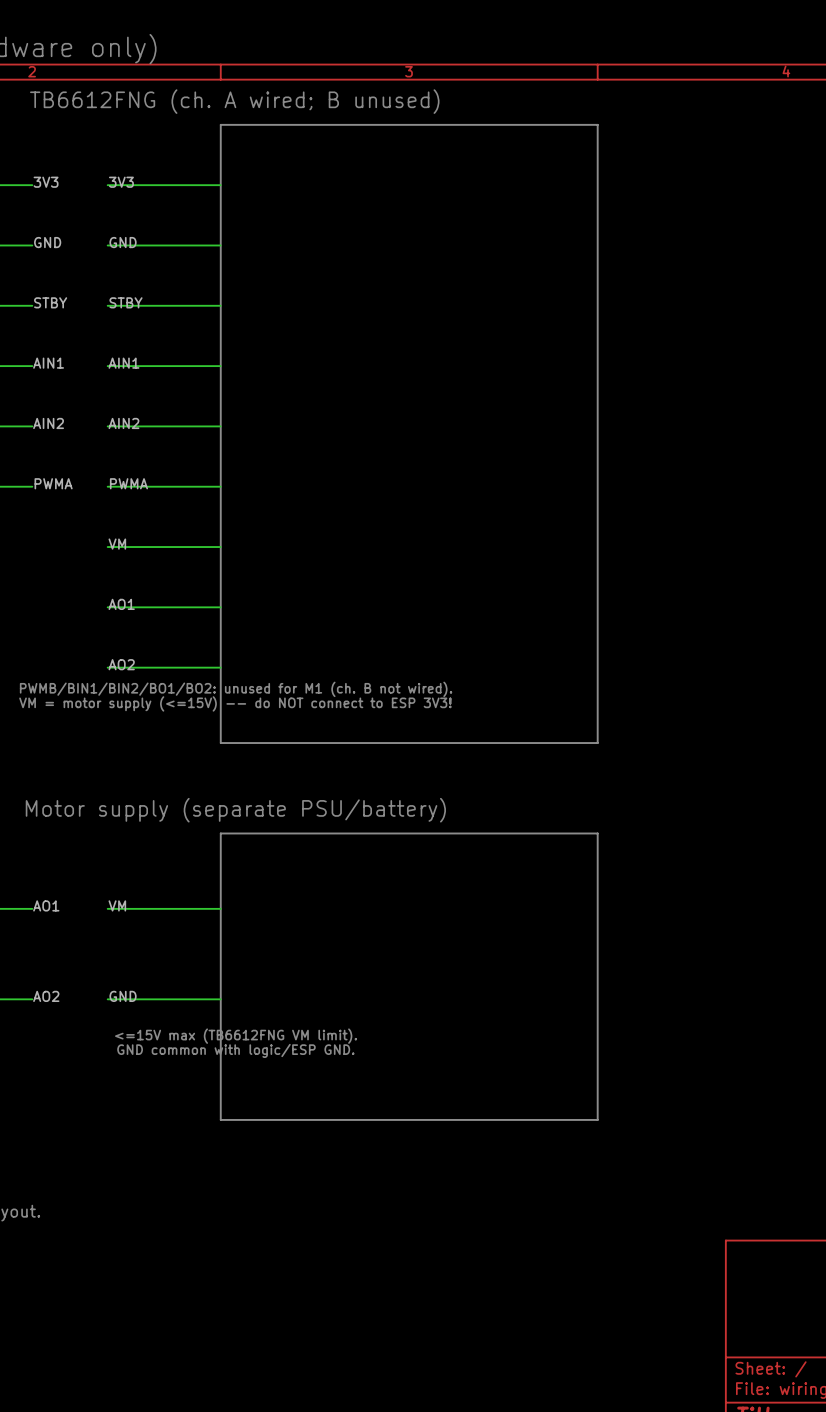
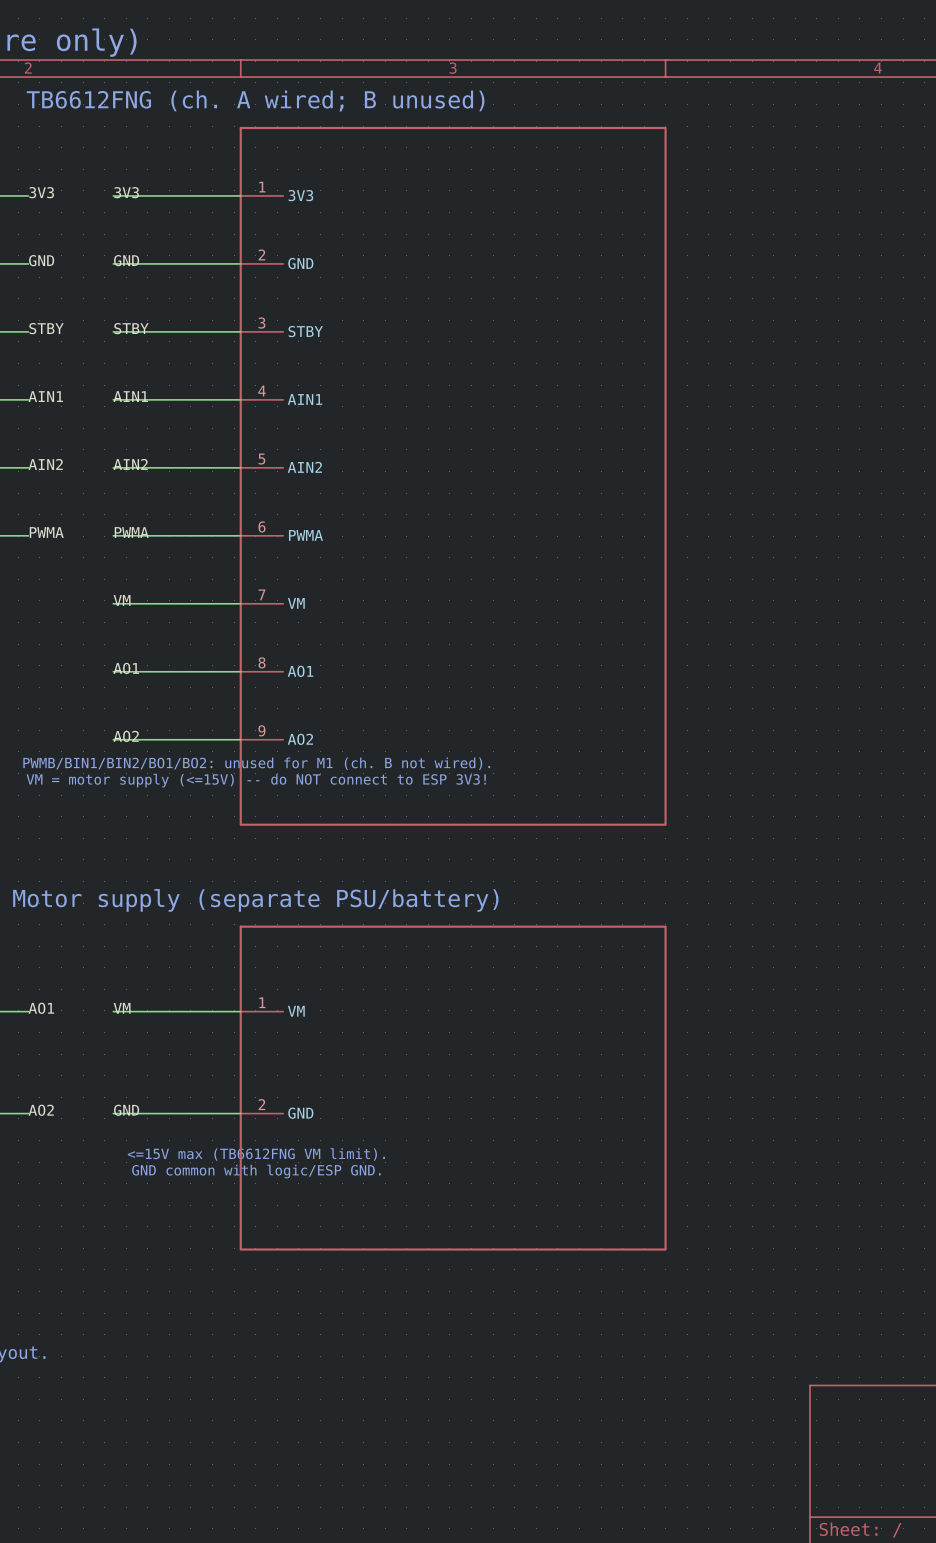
line: (220, 124) (597, 124) (597, 743) (220, 743) (220, 124) -> none
part: none -> (453, 476)
line: (220, 833) (220, 1119) (597, 1119) (597, 833) (220, 833) -> none
part: none -> (453, 1088)

